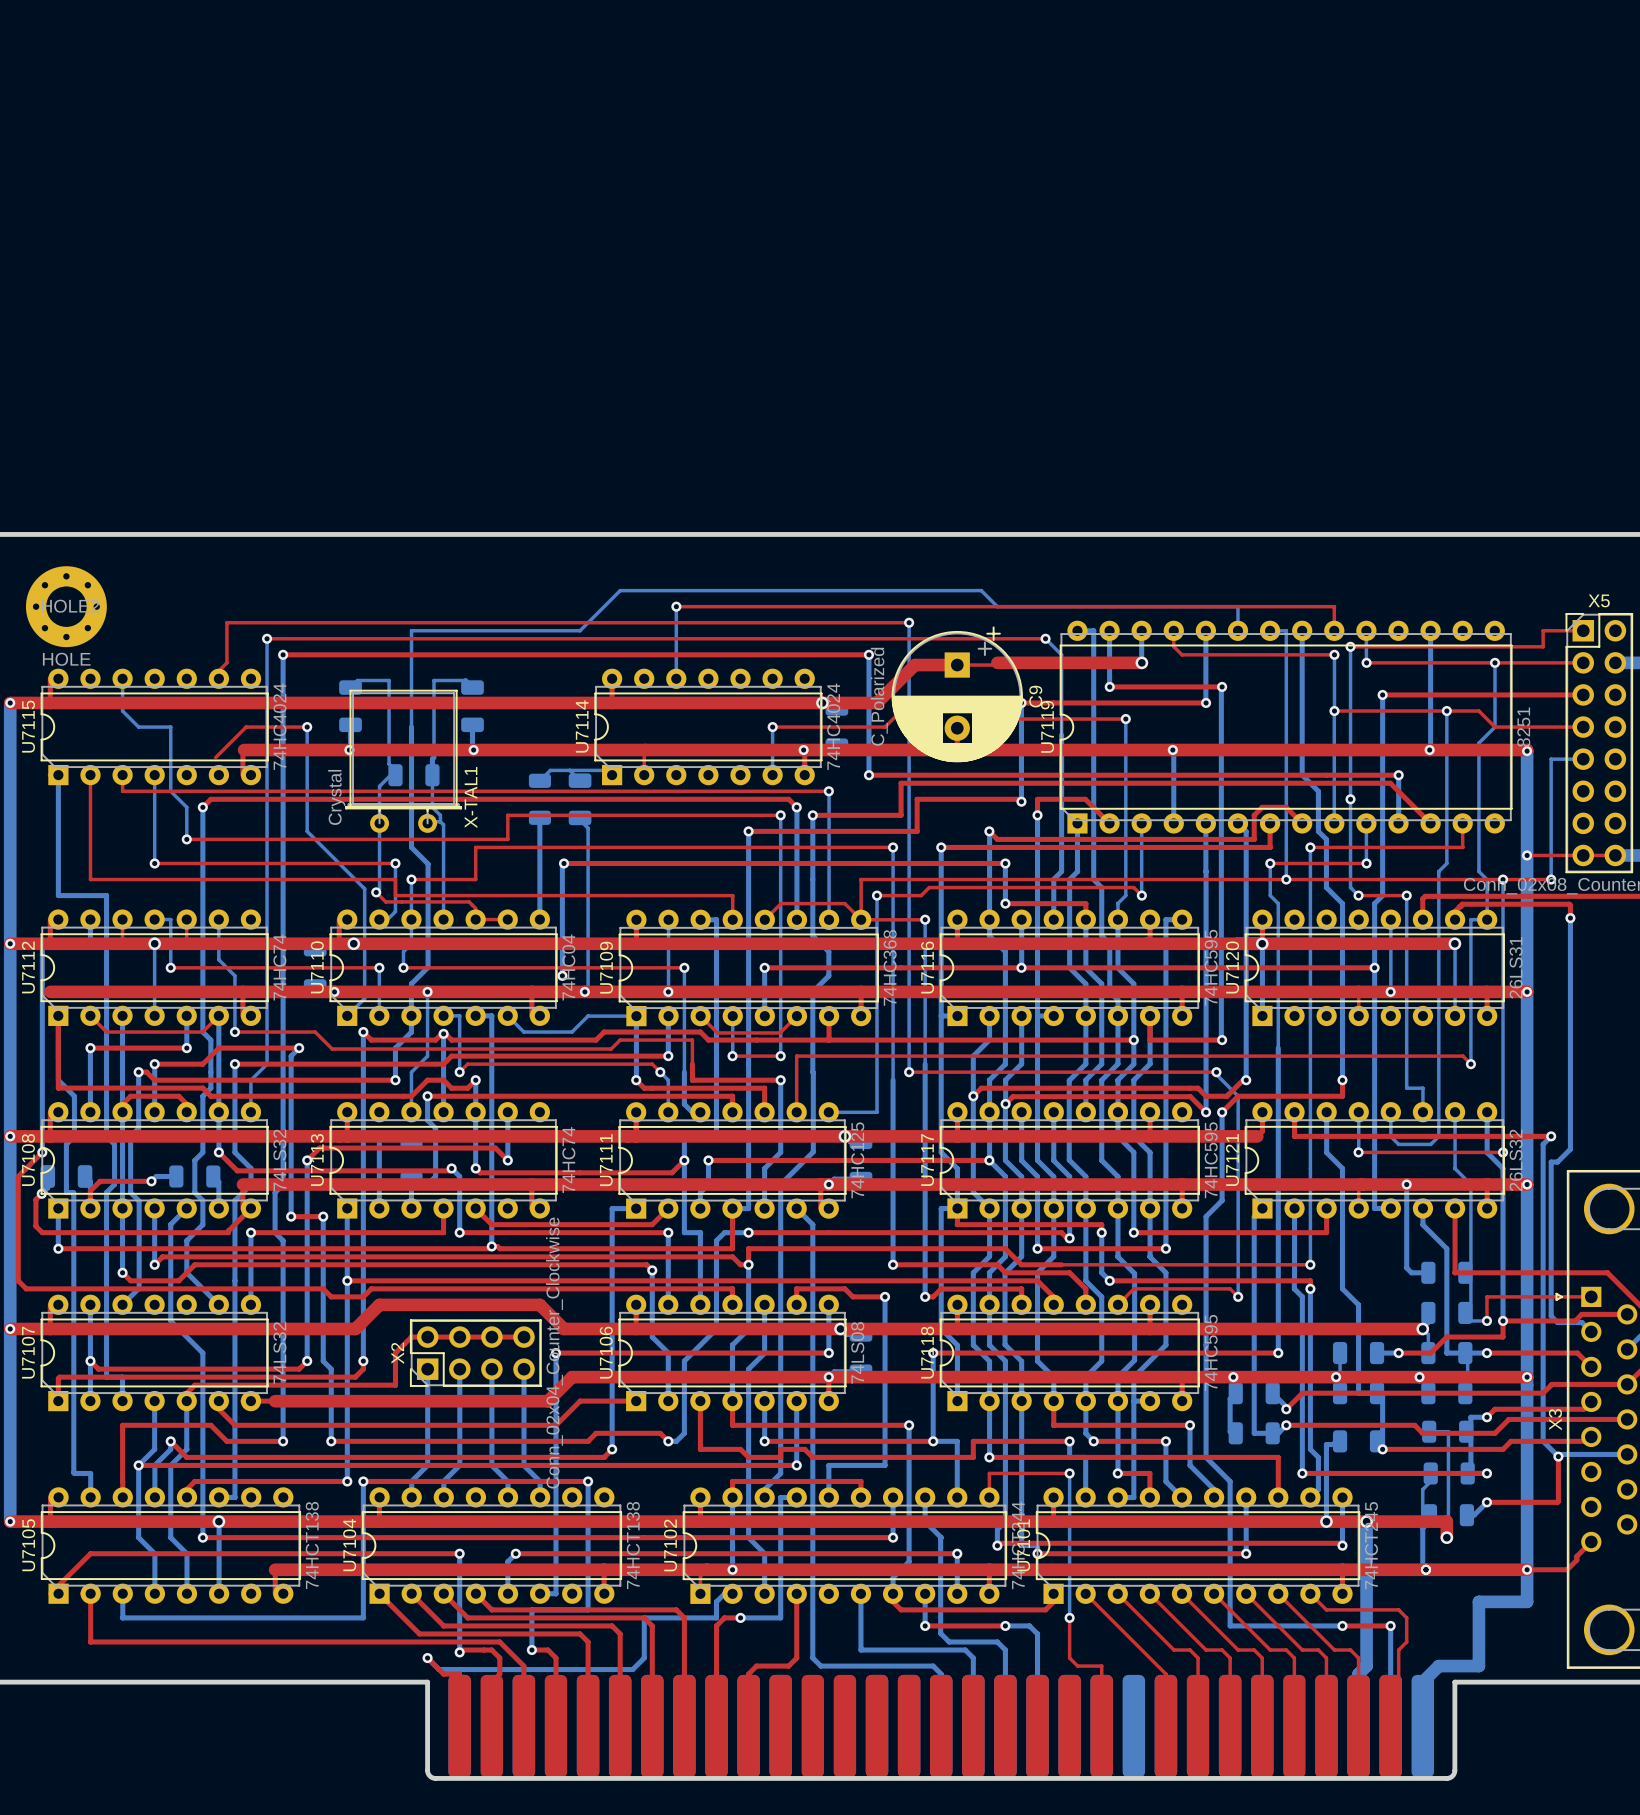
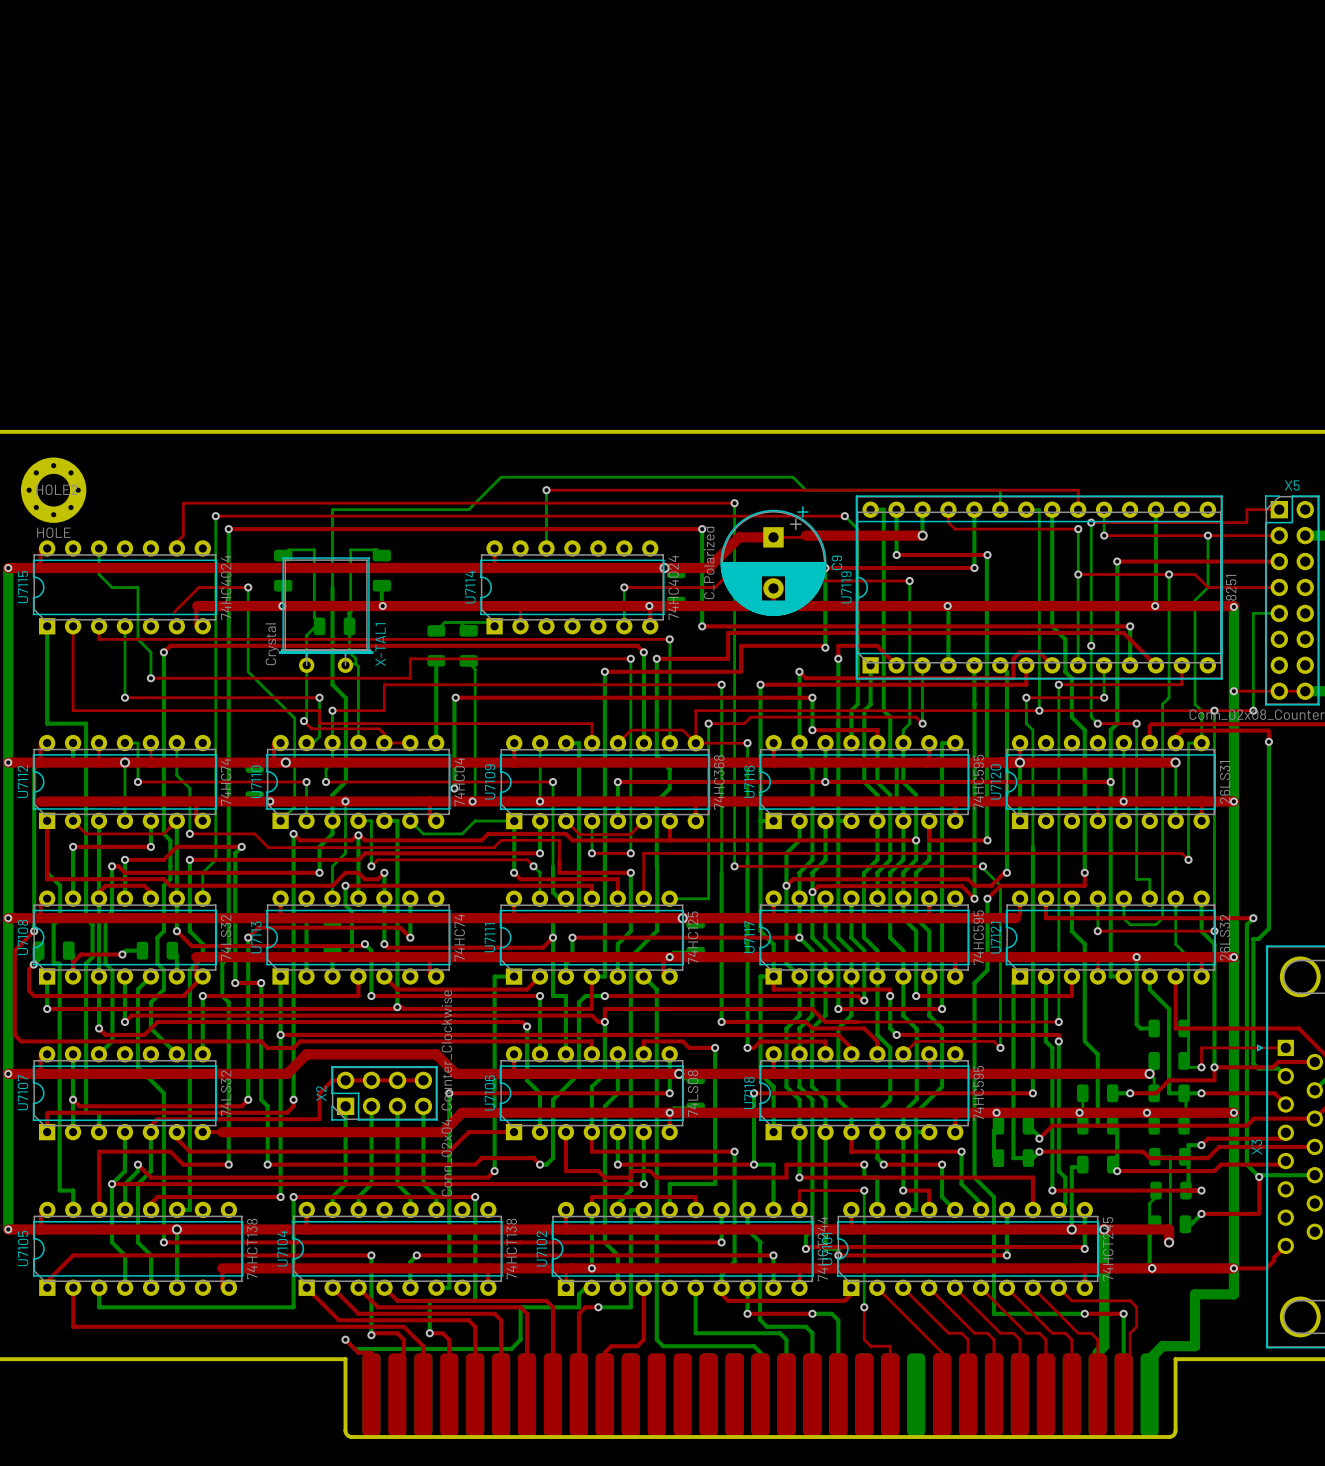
U7119 footprint: [1059, 620, 1513, 834] -> [855, 495, 1223, 680]

